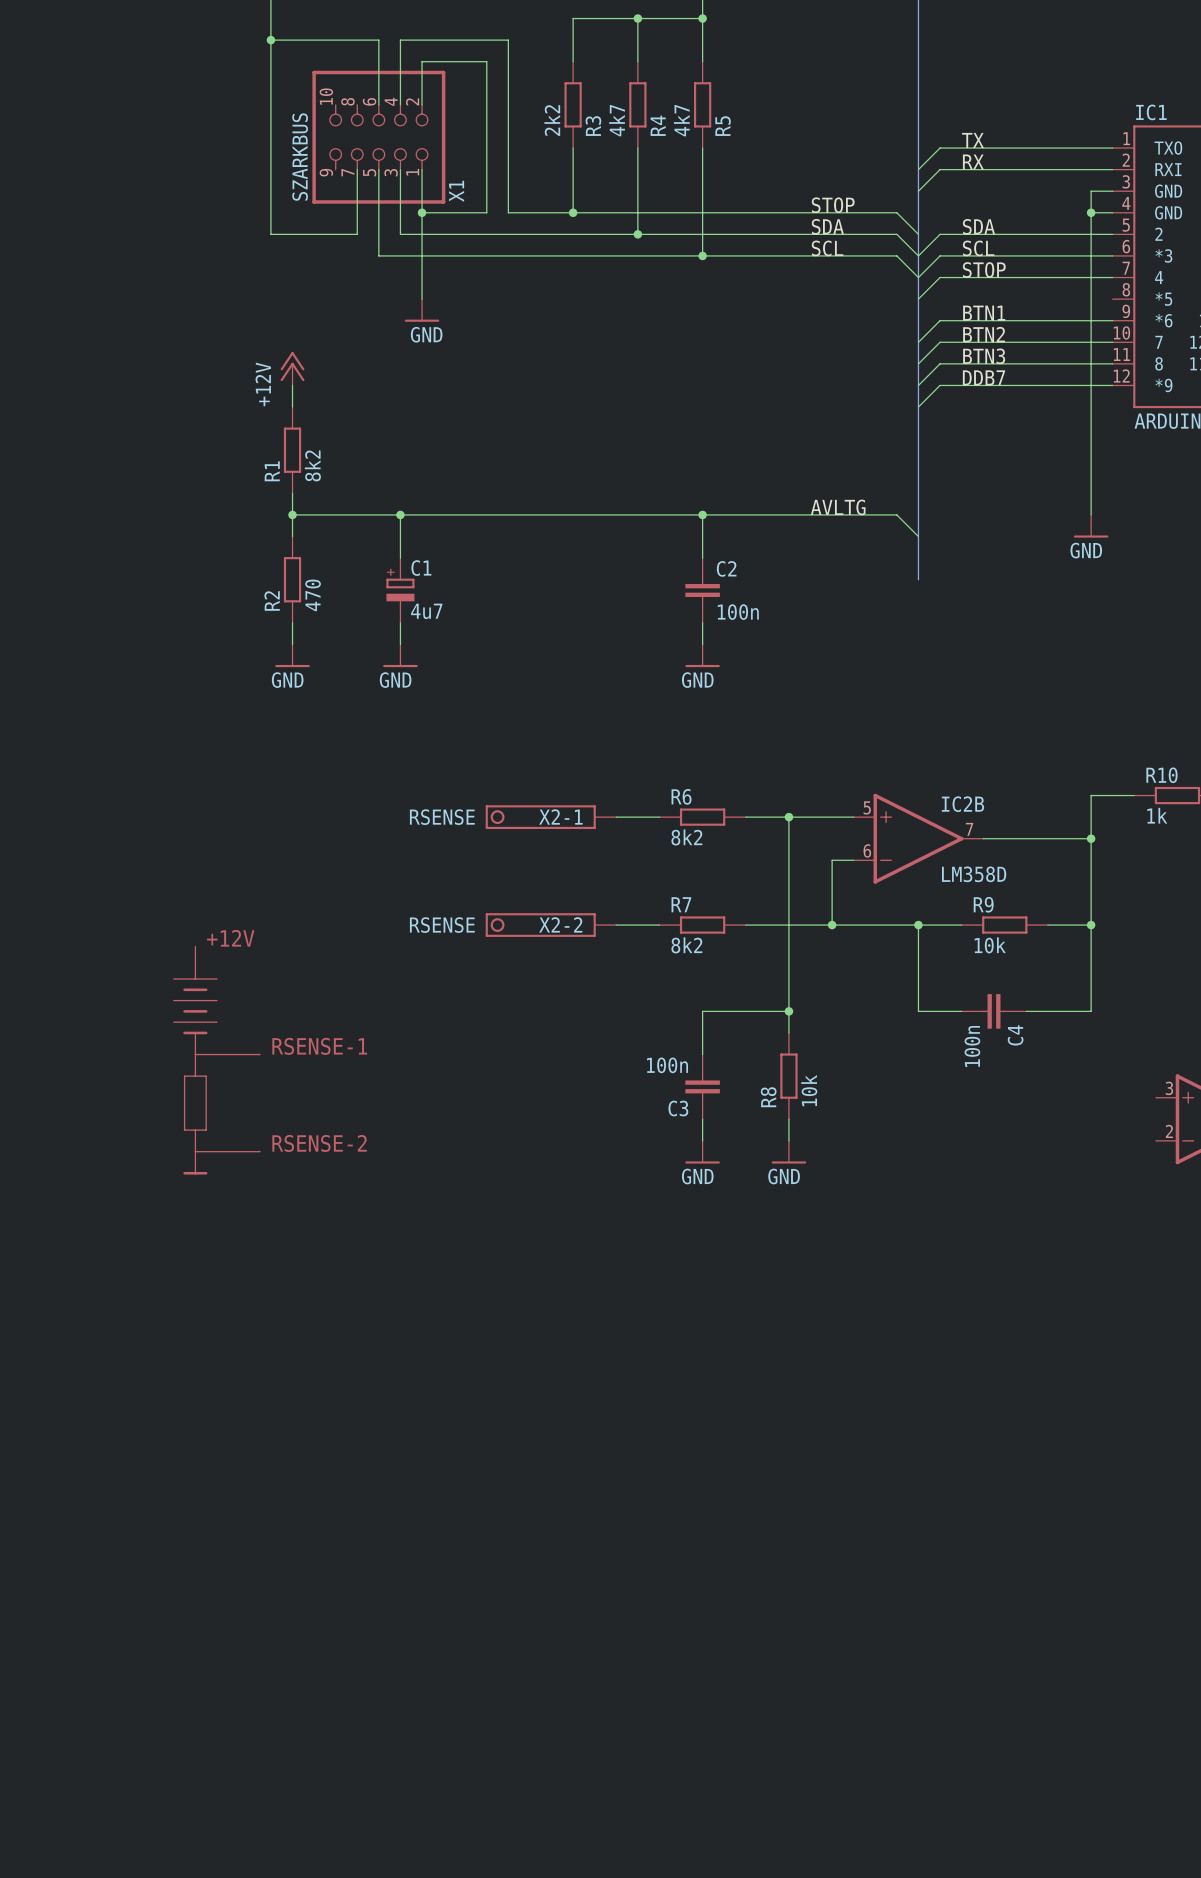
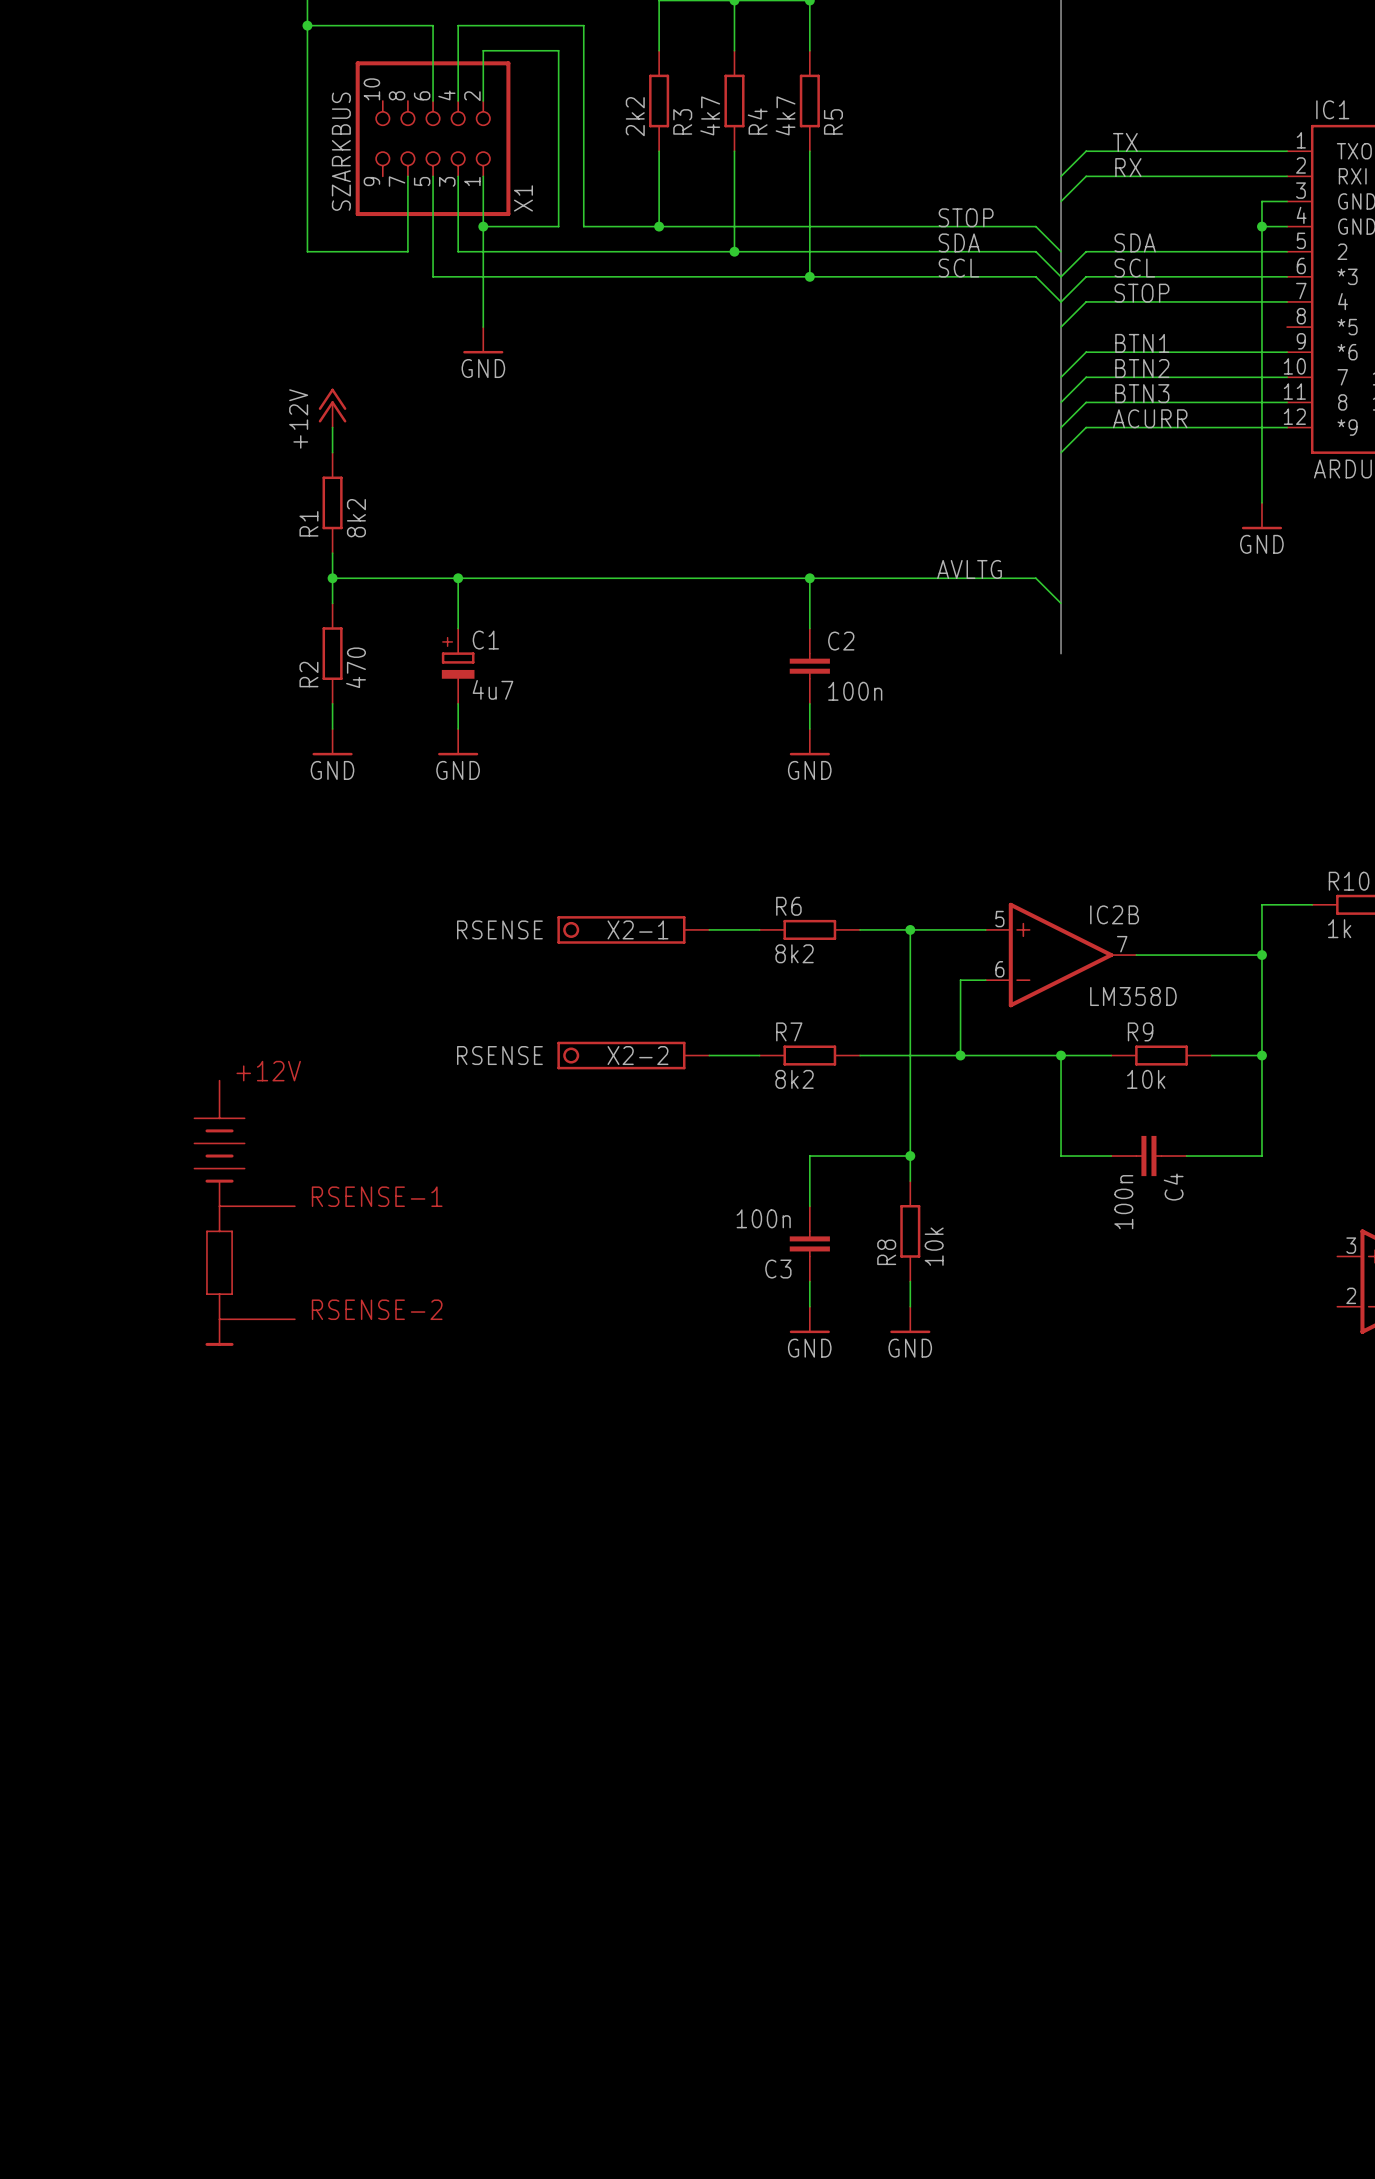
label: DDB7 (984, 377) -> ACURR (1150, 418)
wire: (1091, 450) (1091, 514) -> none
power symbol position: GND (1091, 526) -> GND (1261, 516)

